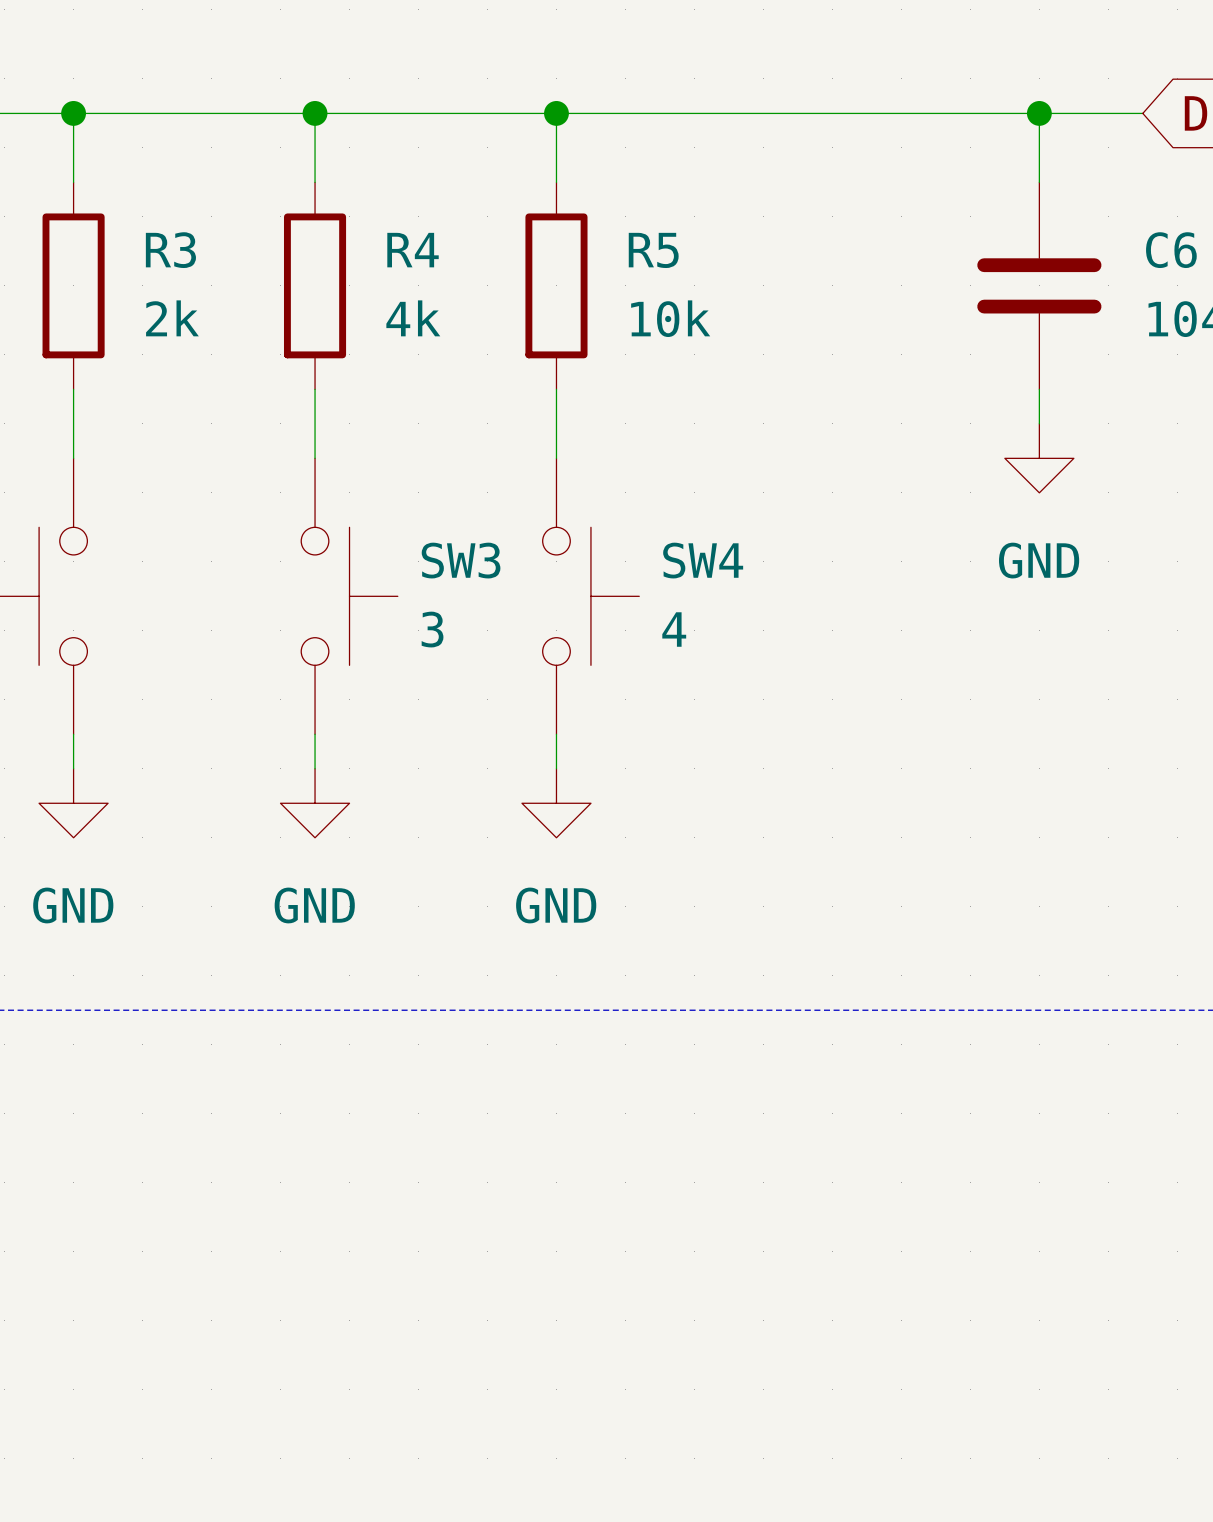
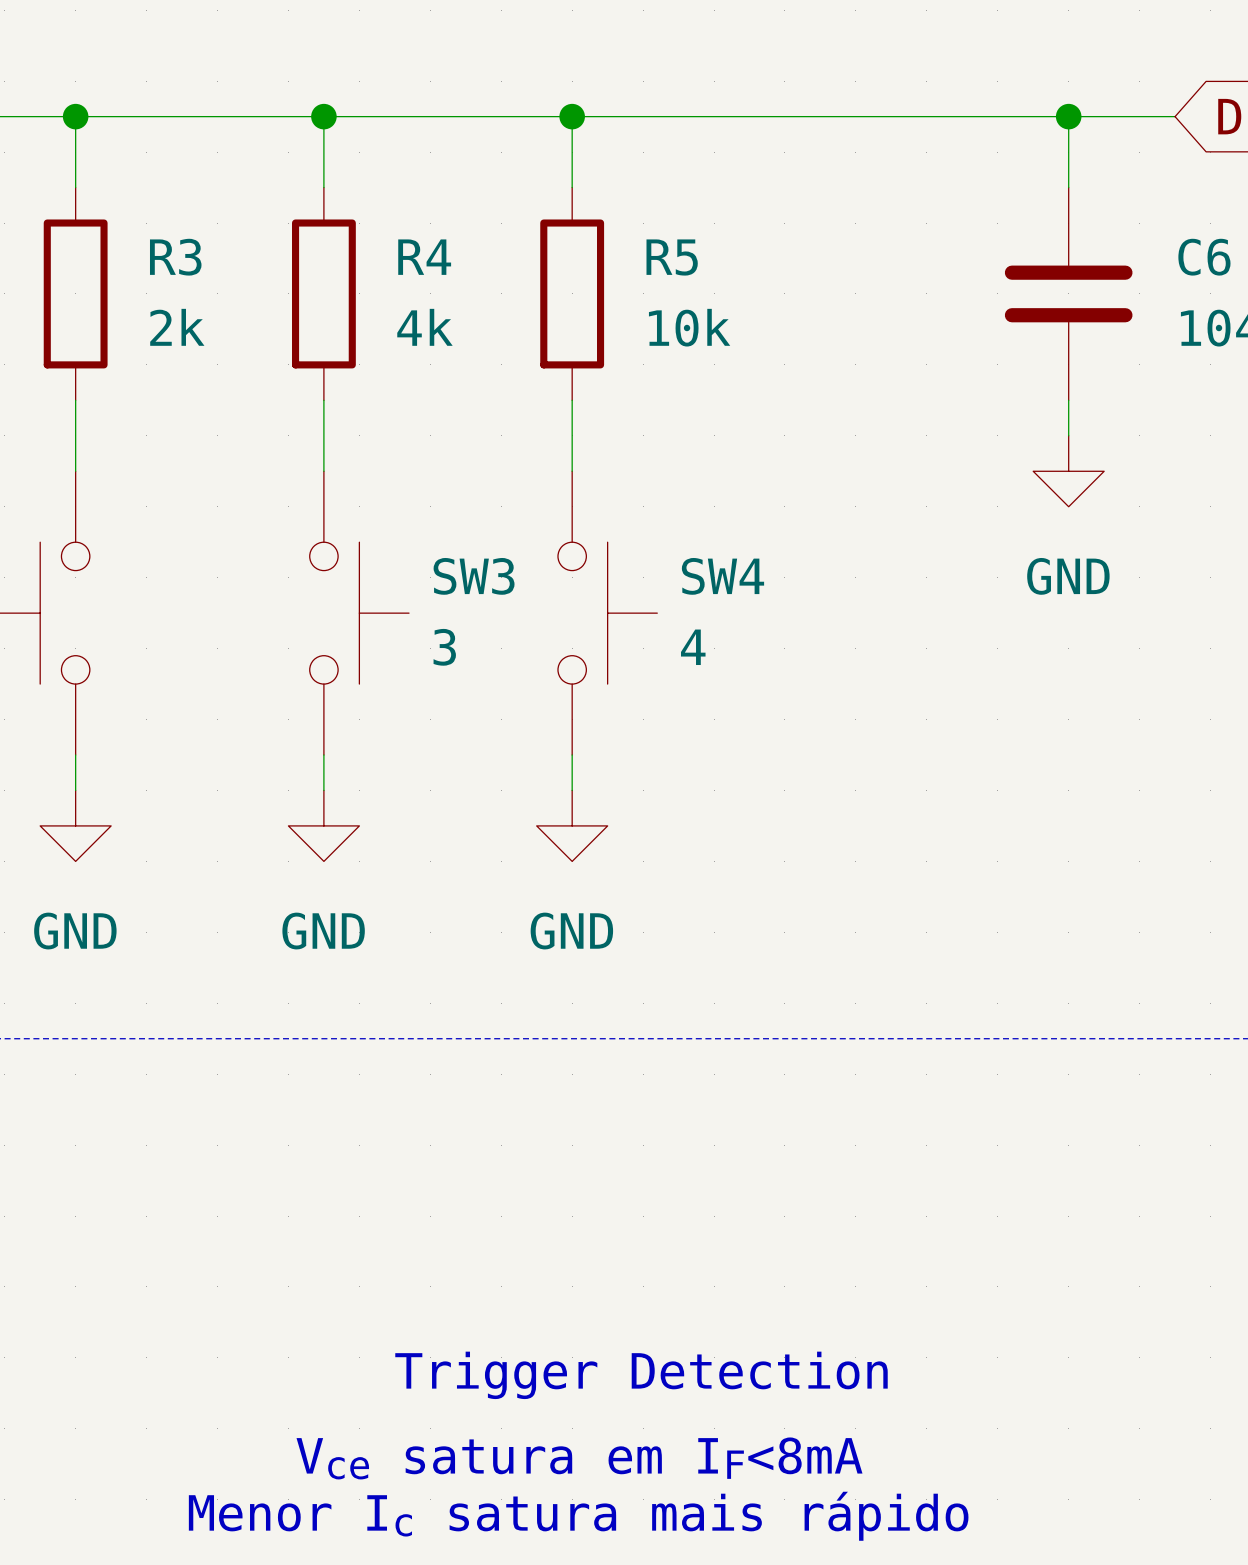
text: none -> Trigger Detection (641, 1375)
text: none -> Vce satura em IF<8mA (579, 1458)
text: none -> Menor Ic satura mais rápido (578, 1516)

